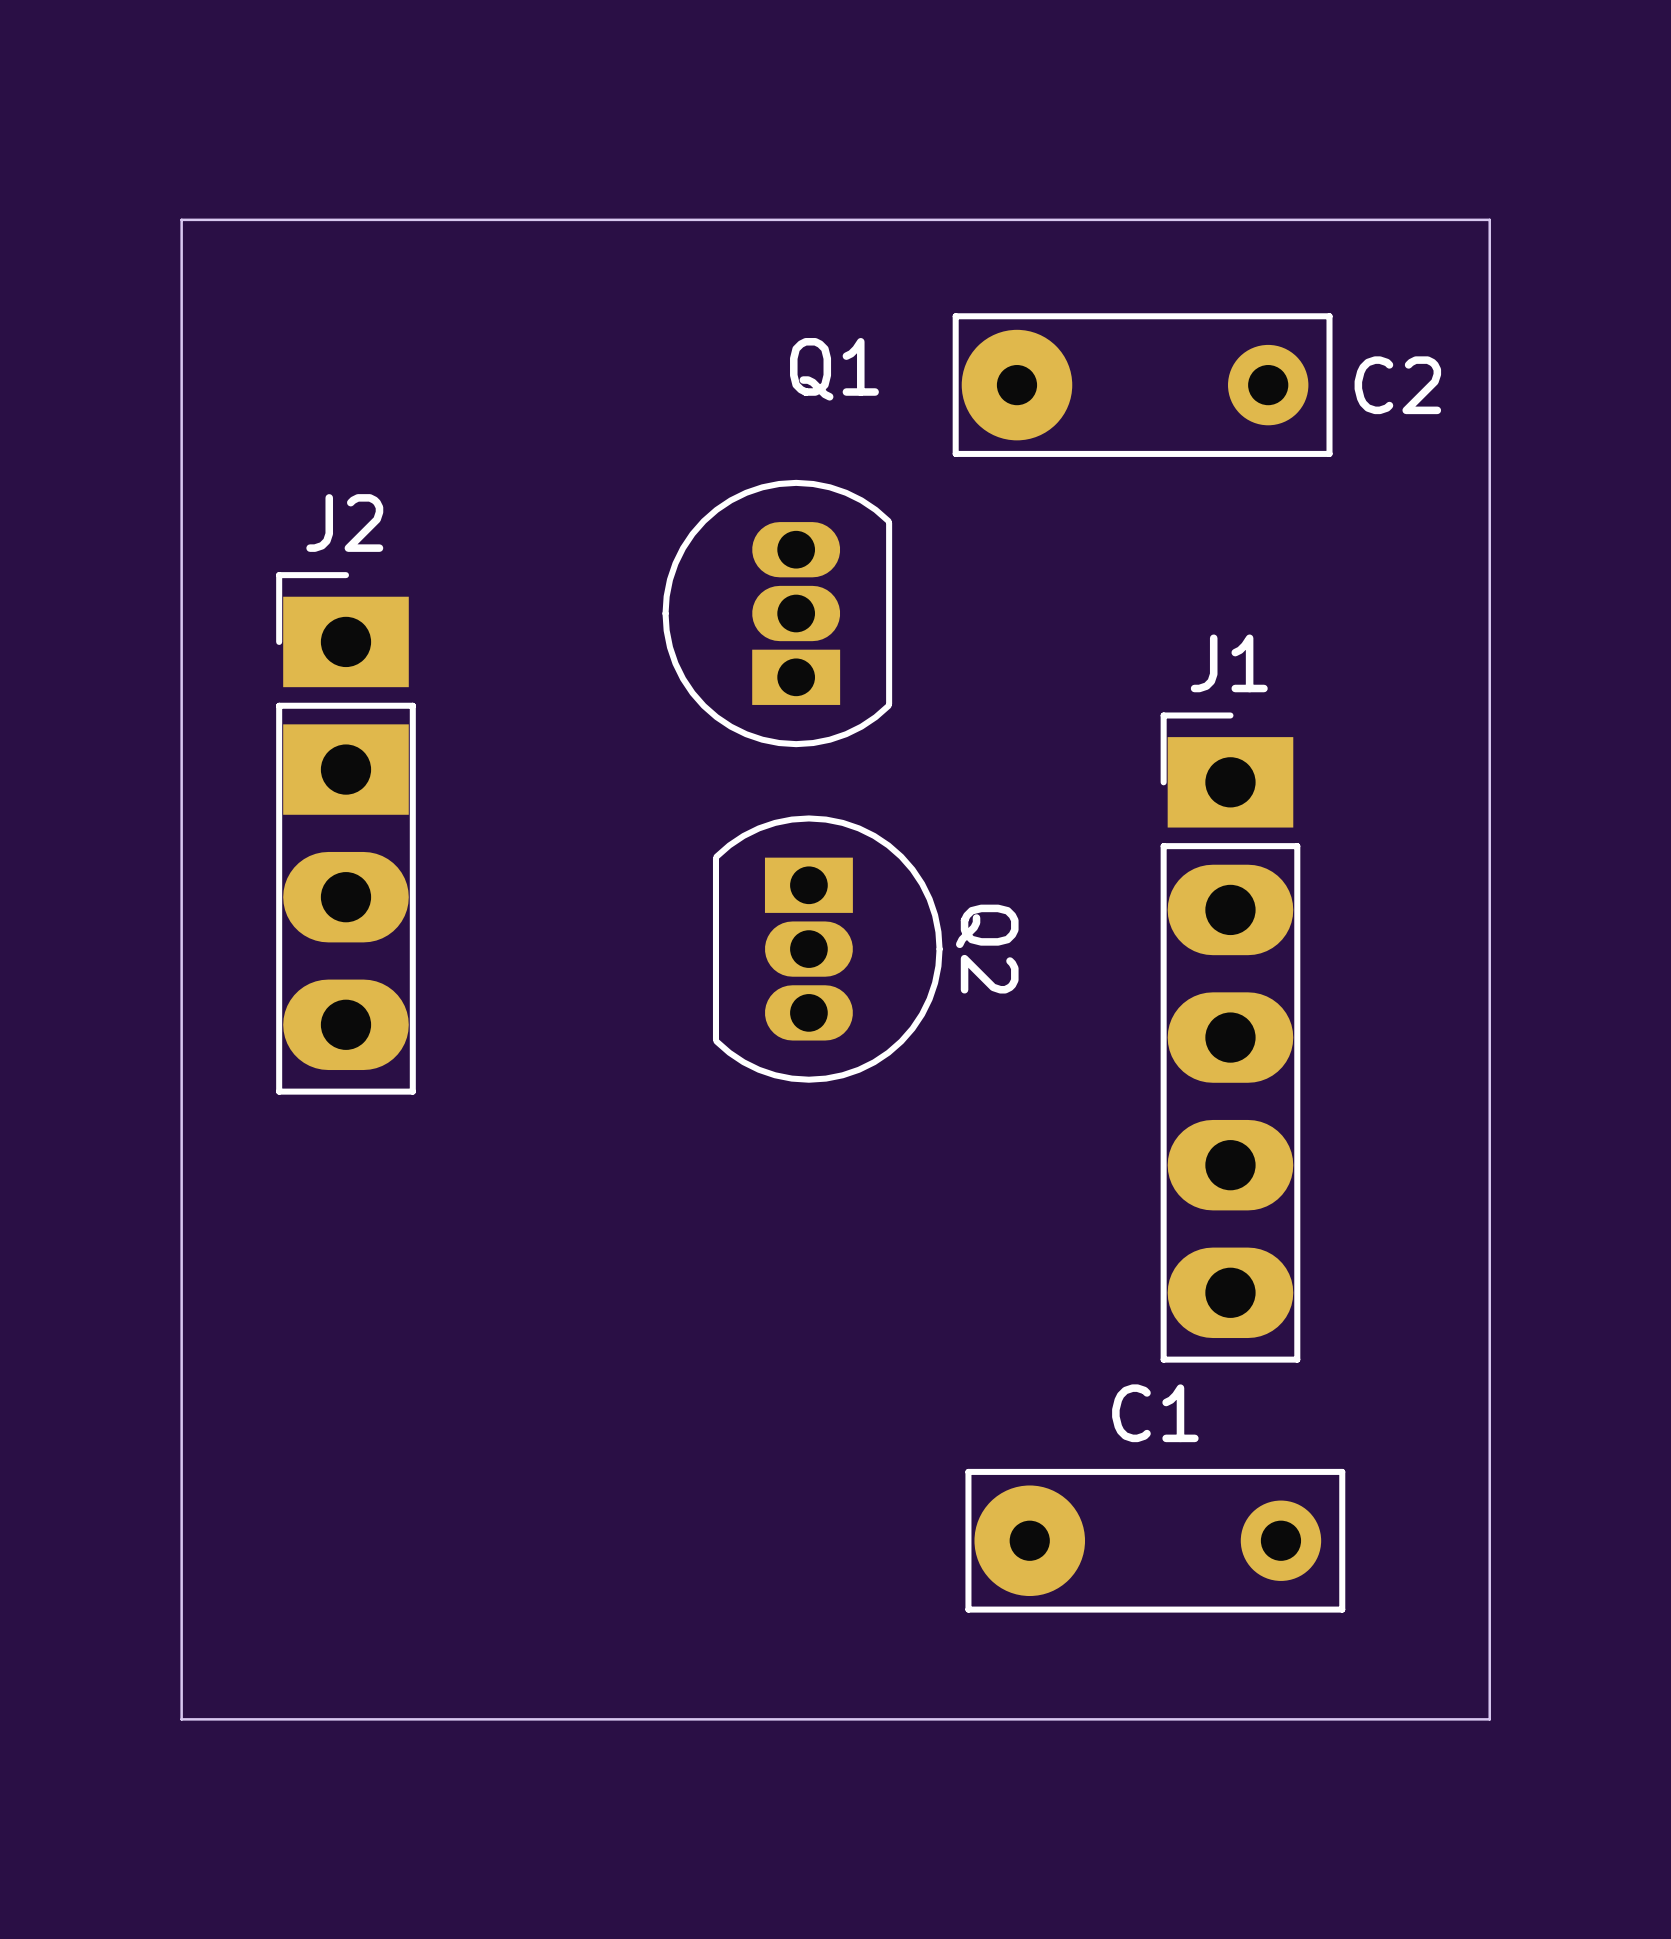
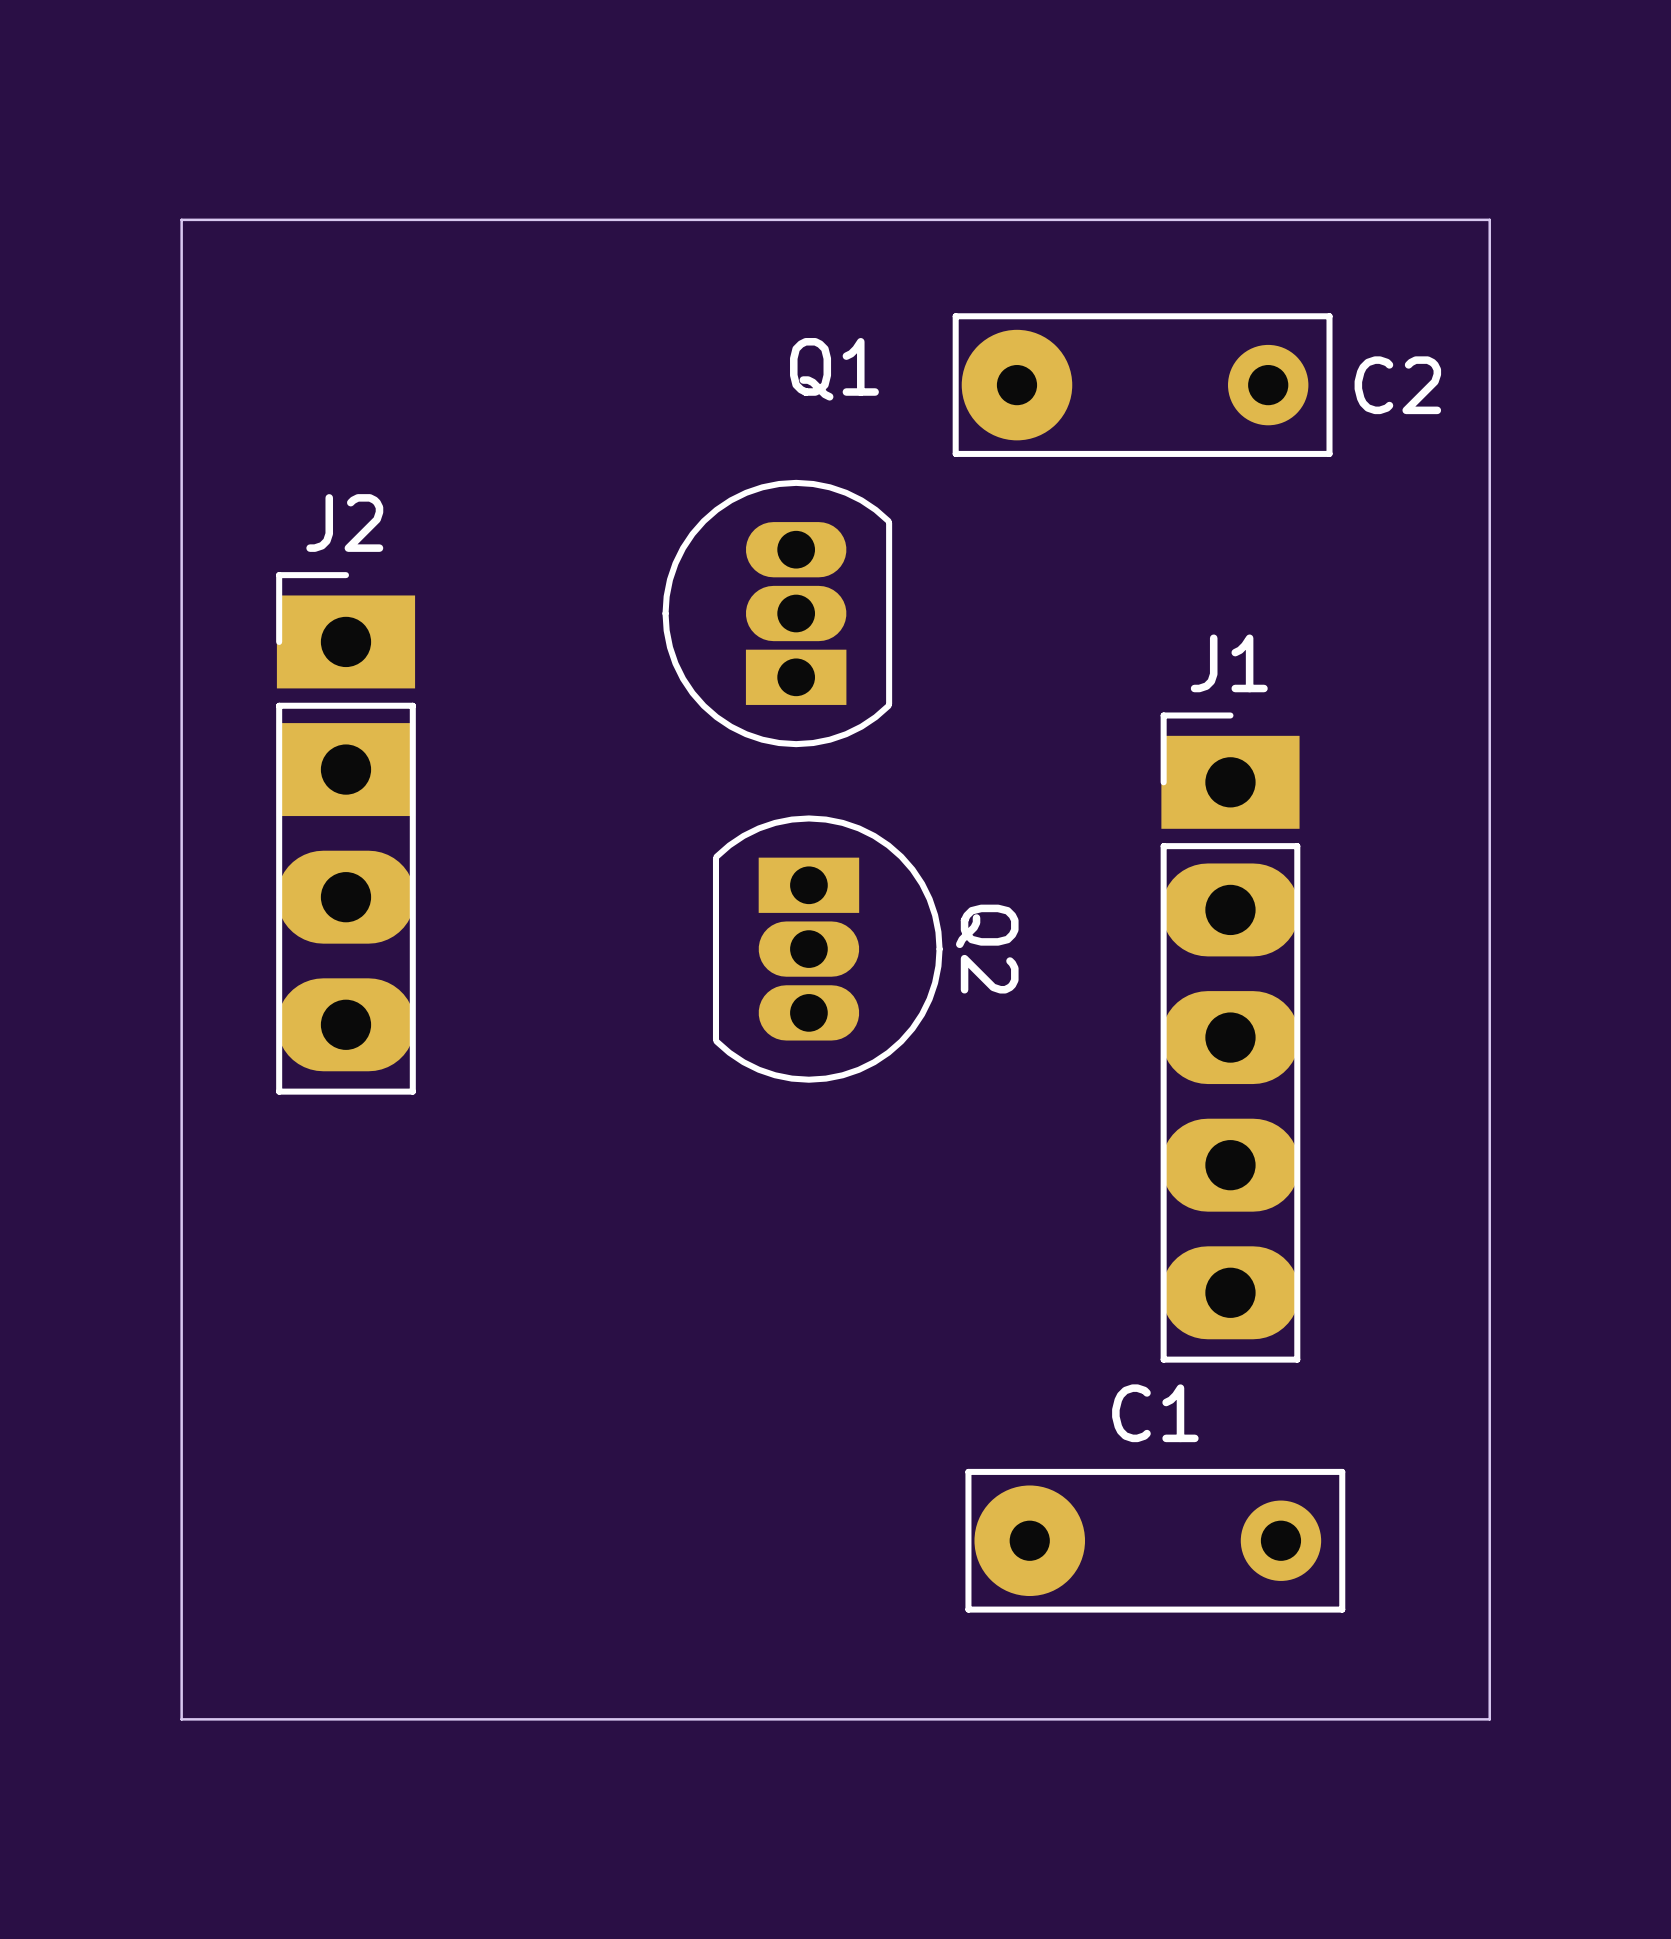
Q1 footprint: [662, 479, 893, 748] -> [662, 479, 893, 748]
J2 footprint: [276, 572, 416, 1095] -> [276, 572, 416, 1095]
J1 footprint: [1160, 712, 1301, 1363] -> [1160, 712, 1301, 1363]
Q2 footprint: [712, 815, 943, 1083] -> [712, 815, 943, 1083]

